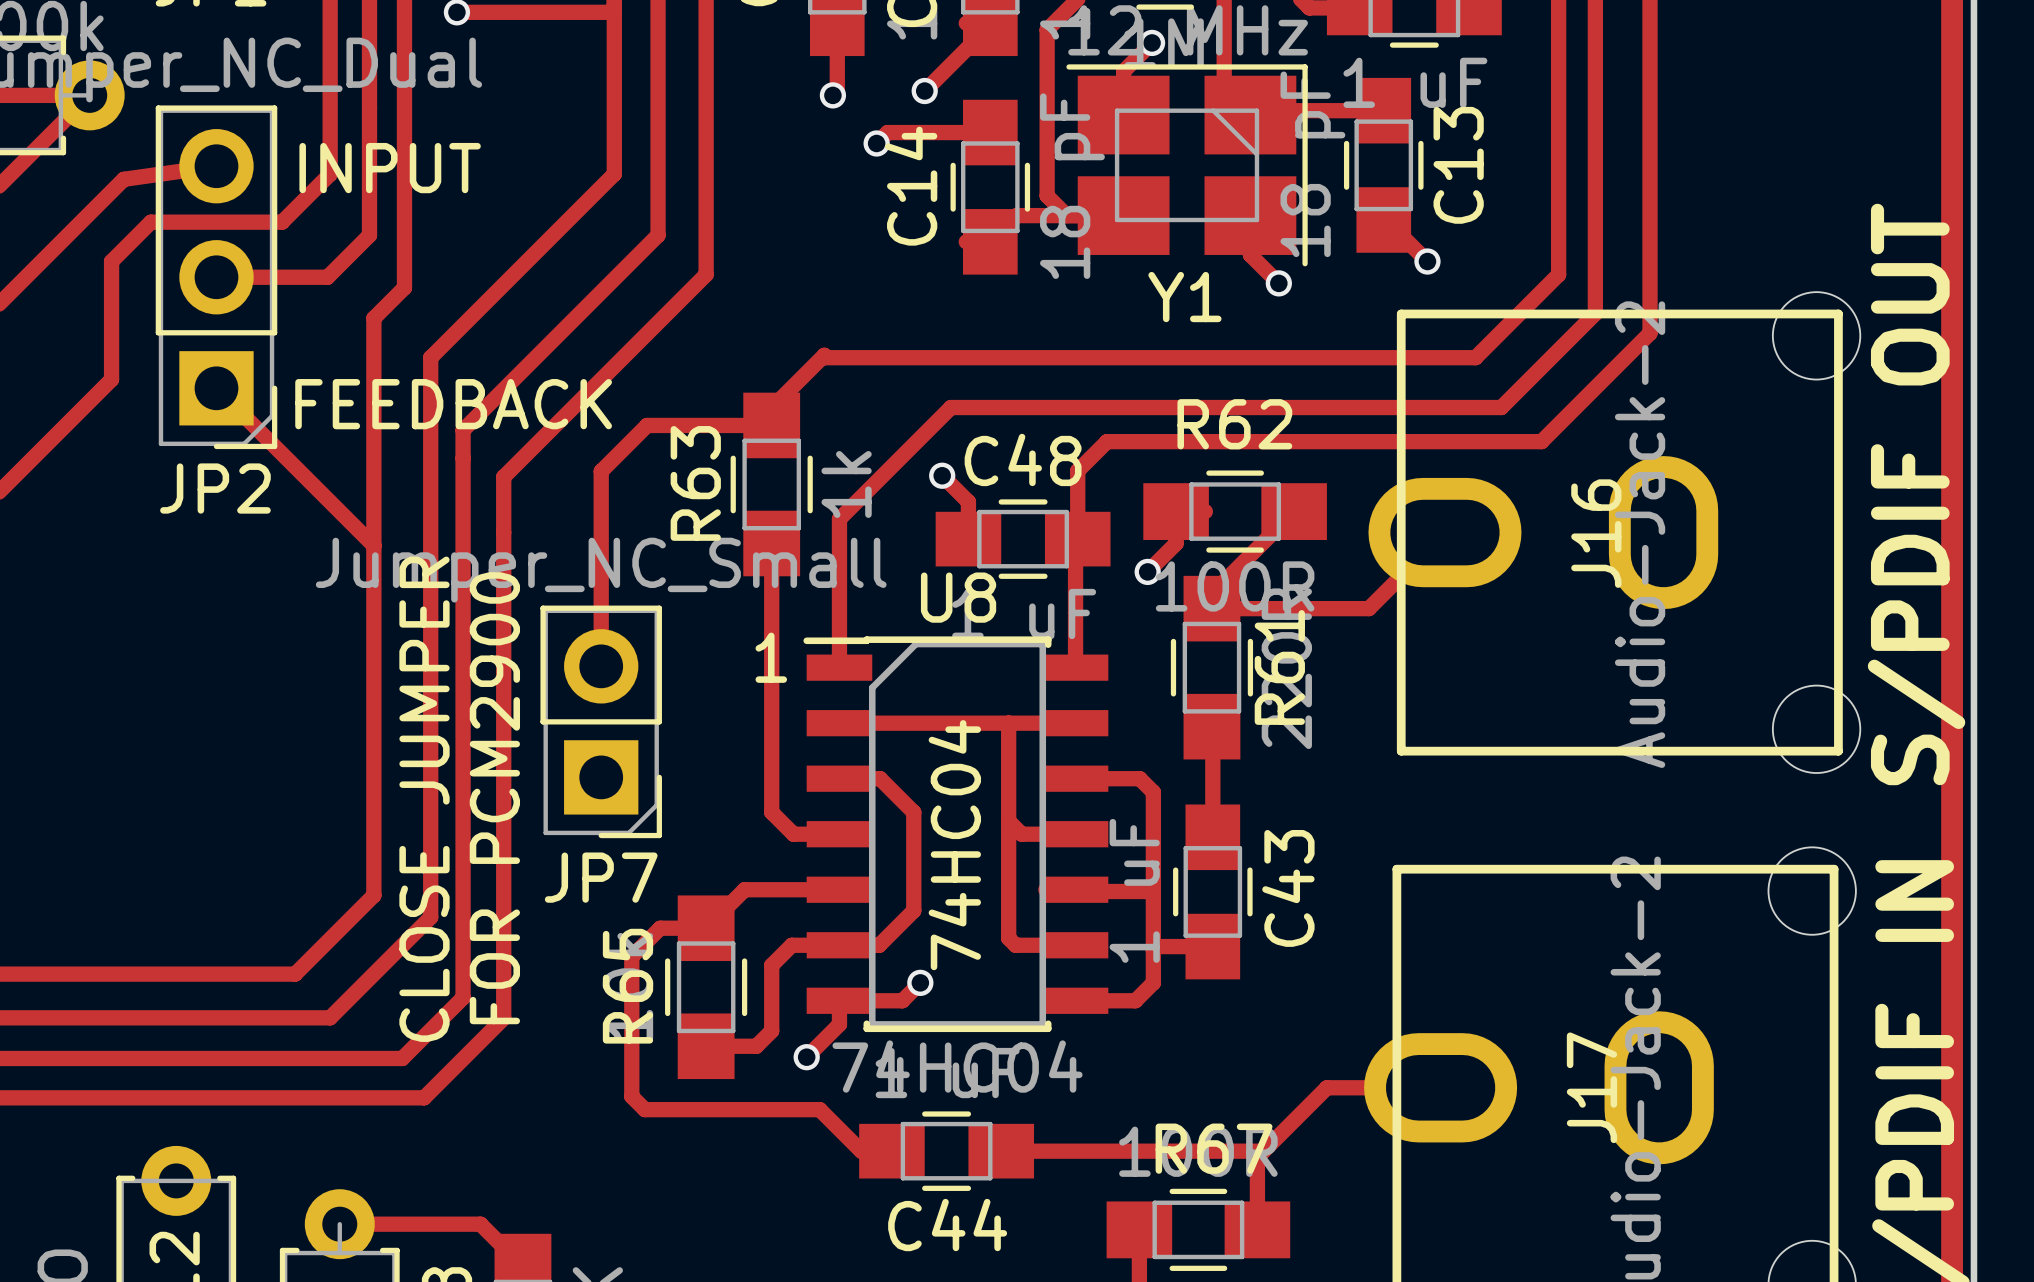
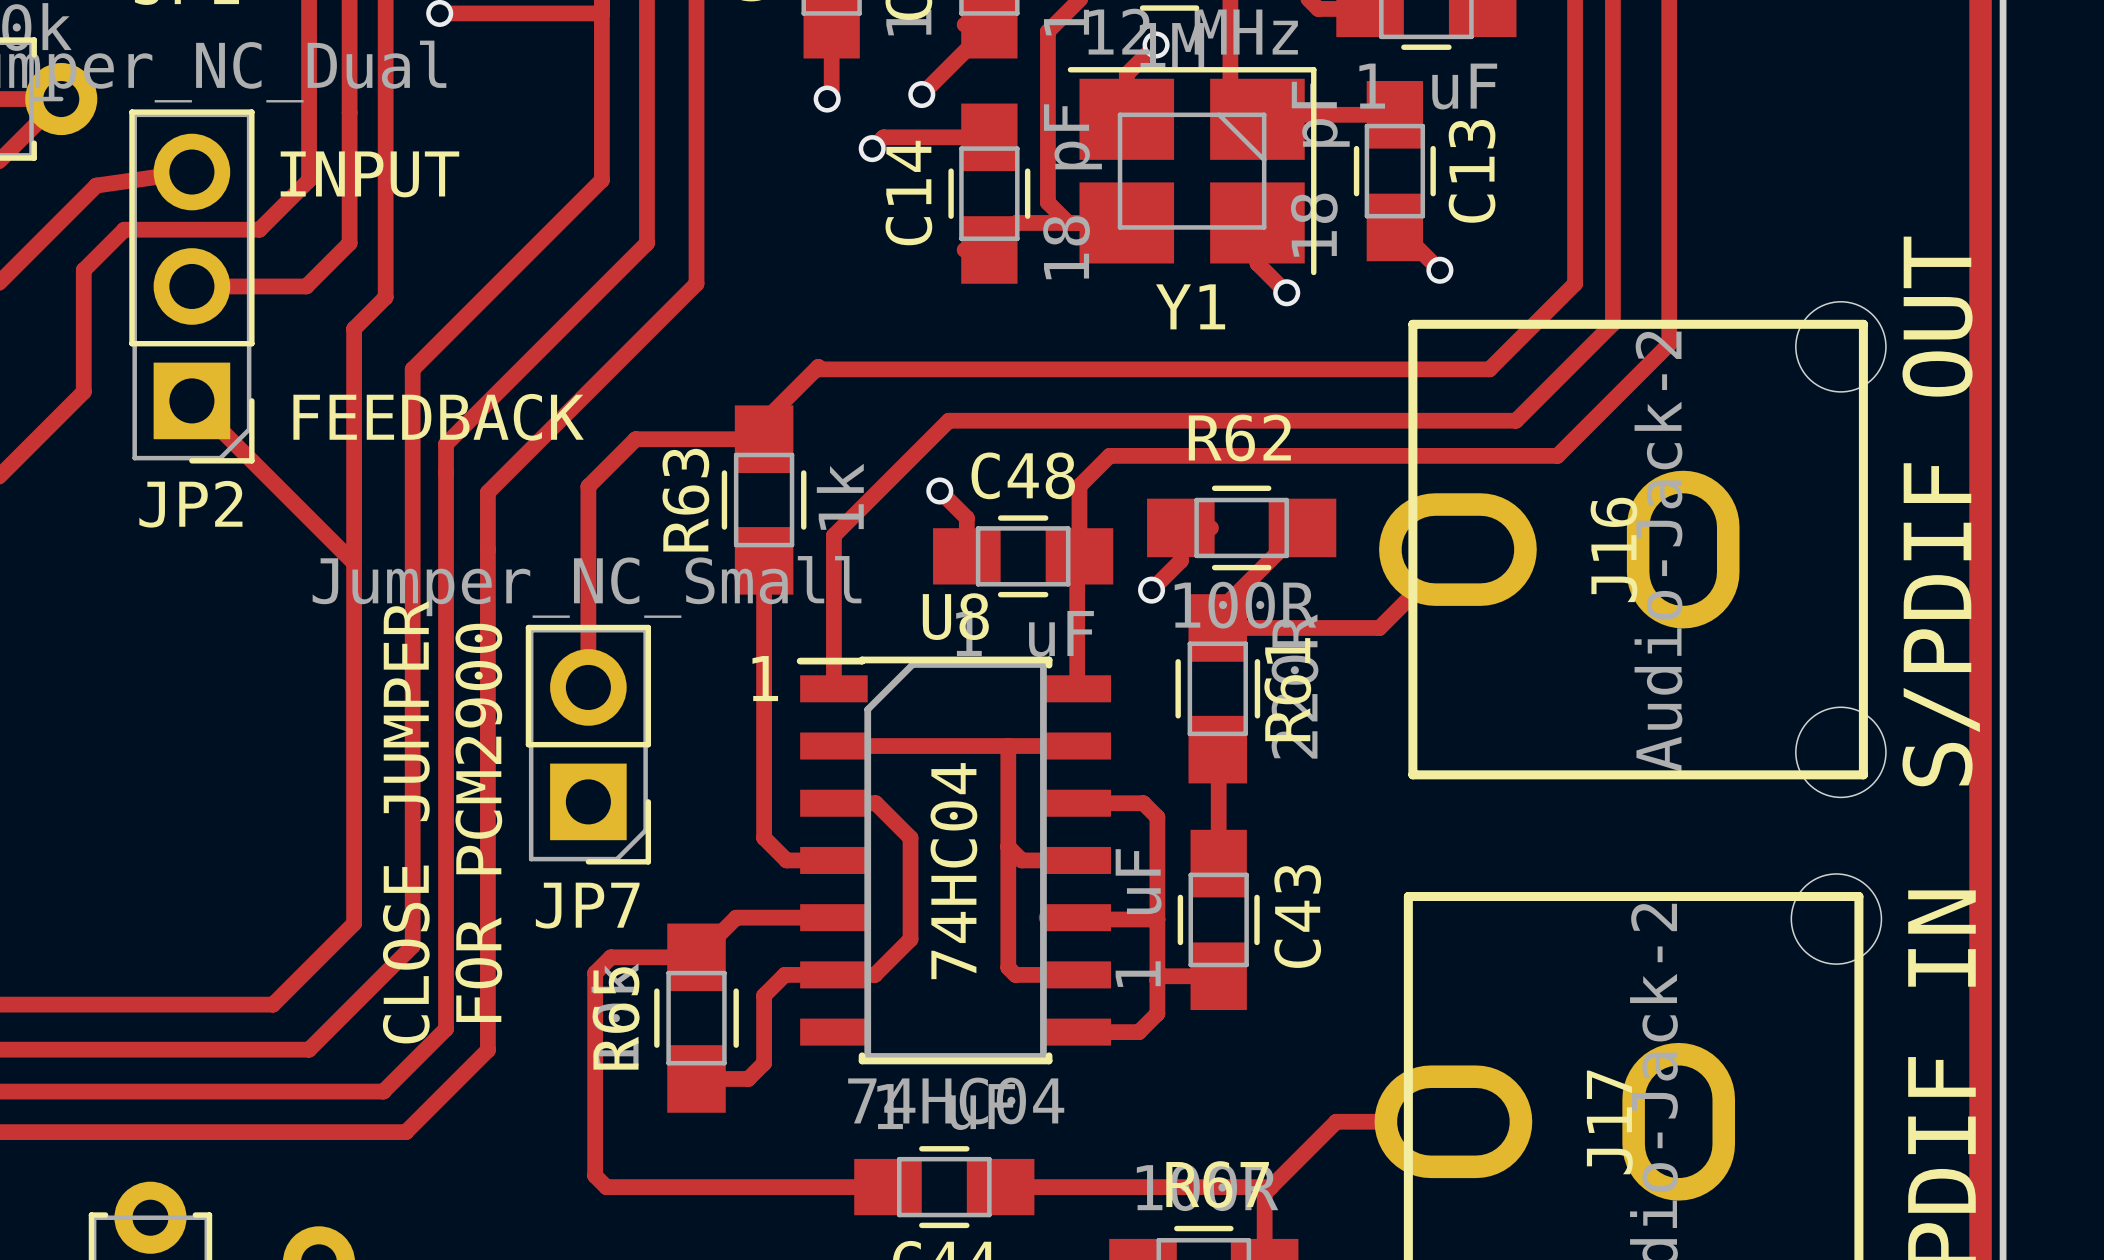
track: (660, 928) (631, 956) (631, 1096) (644, 1109) (819, 1109) (861, 1151) -> (649, 957) (610, 957) (595, 973) (595, 1175) (606, 1187) (856, 1187)
track: (920, 982) (902, 1000) (839, 1000) (839, 1024) (806, 1057) -> none
via: (920, 982) -> none
via: (806, 1057) -> none

